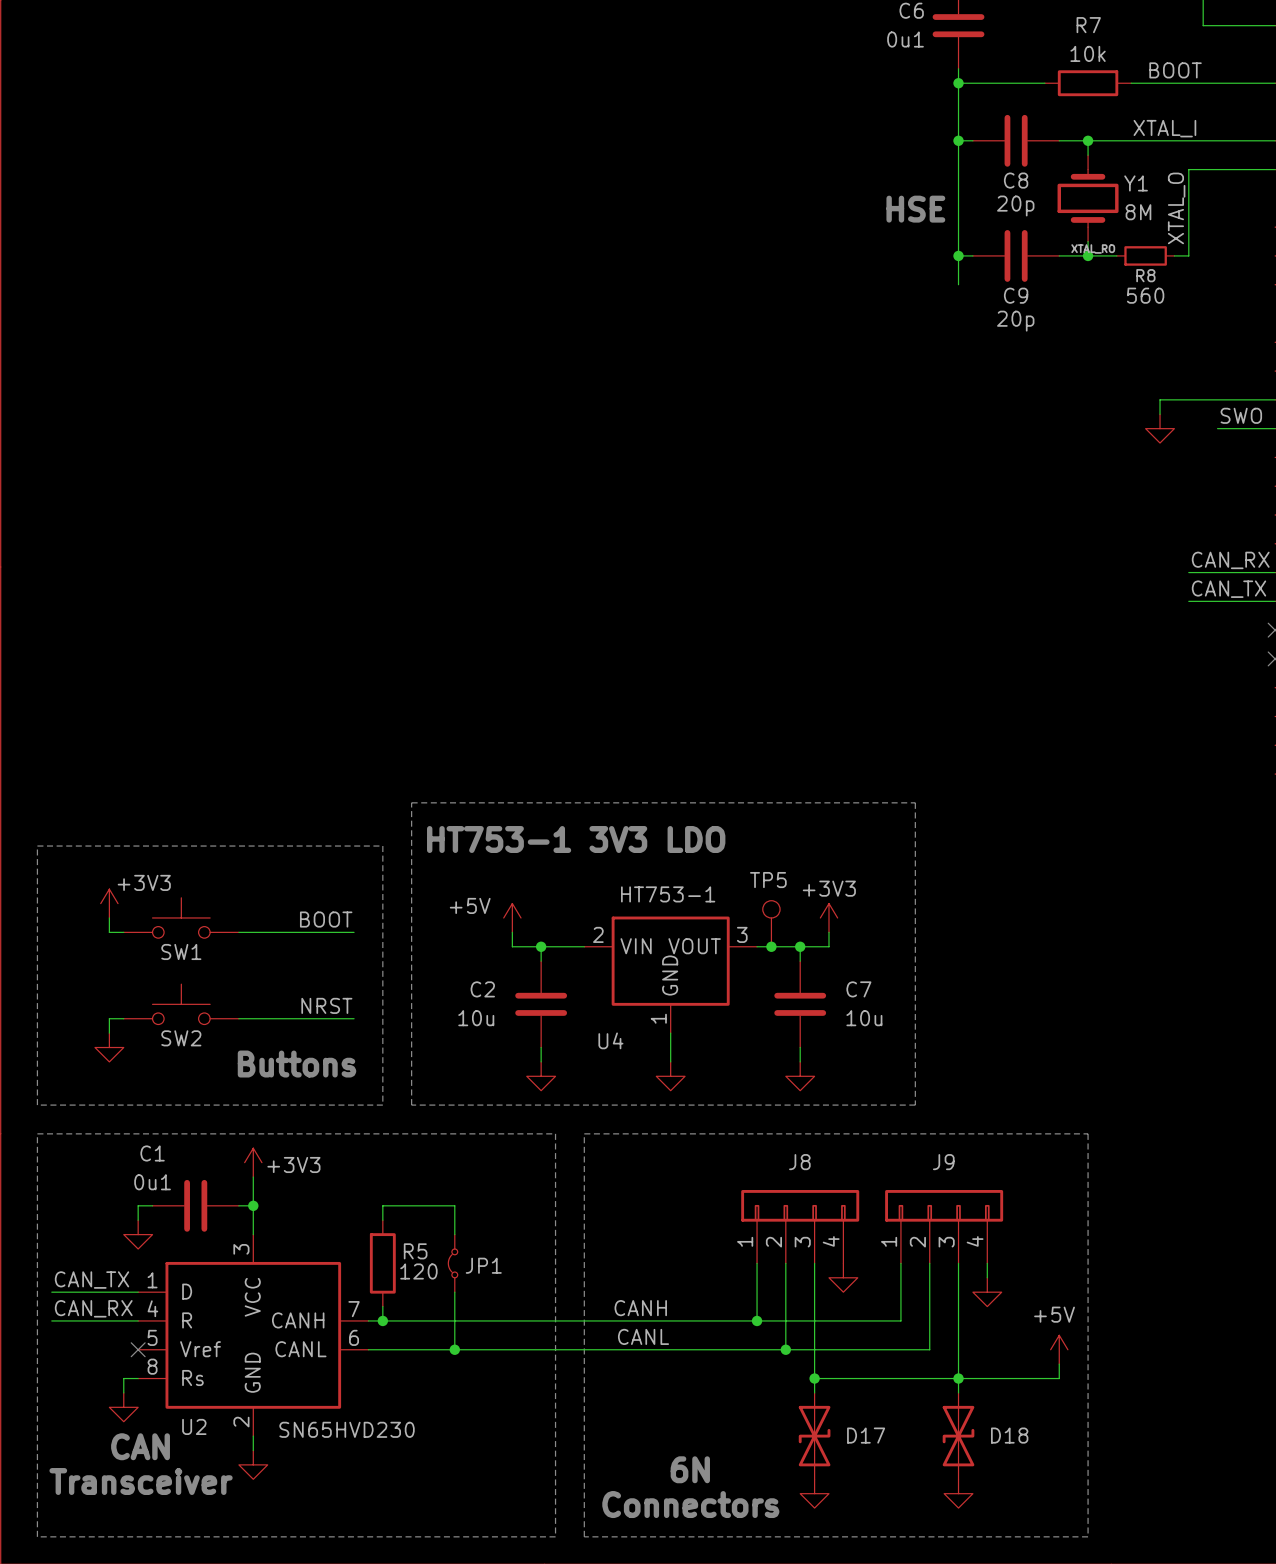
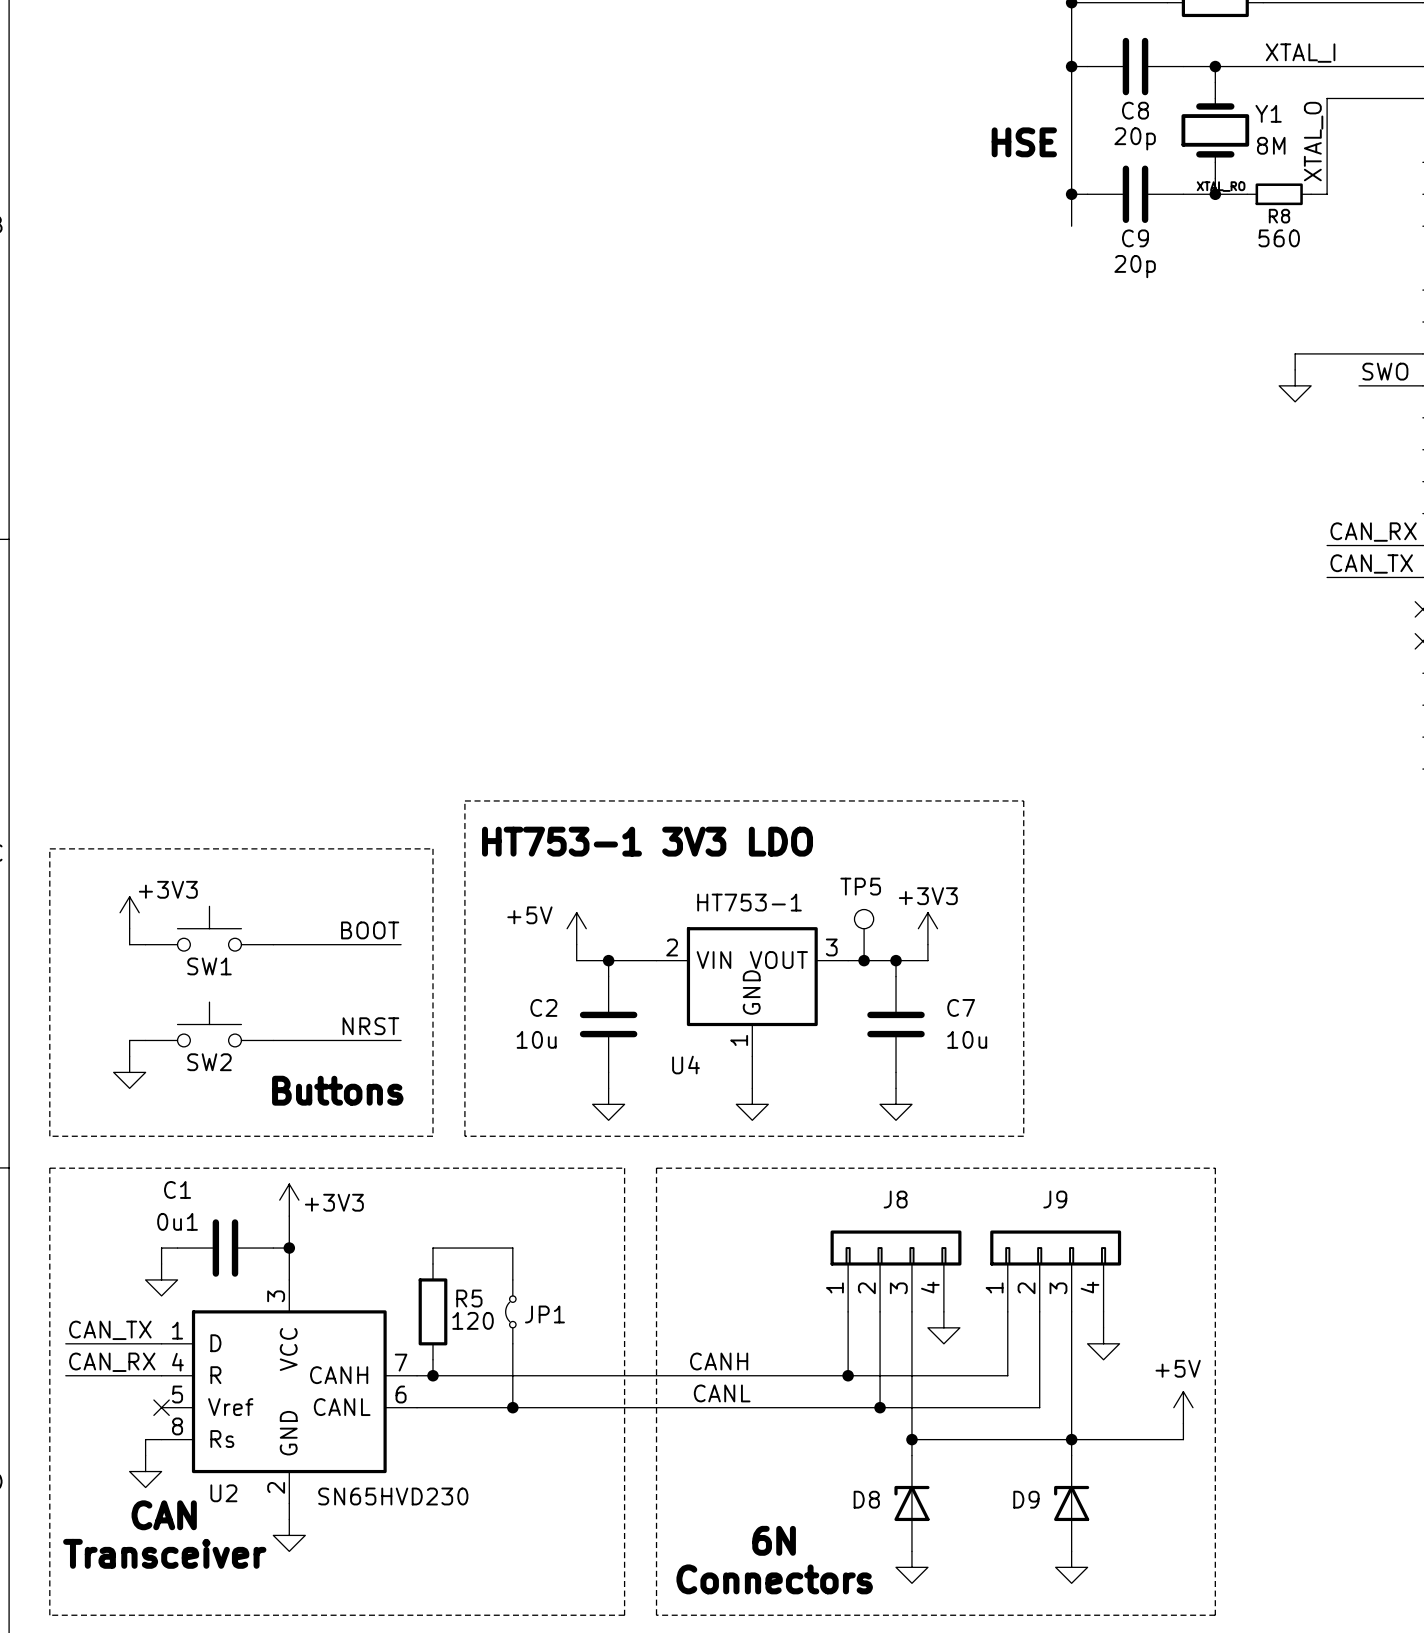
D17: (814, 1436) -> none
D8: none -> (911, 1503)
D18: (958, 1436) -> none
D9: none -> (1071, 1503)

